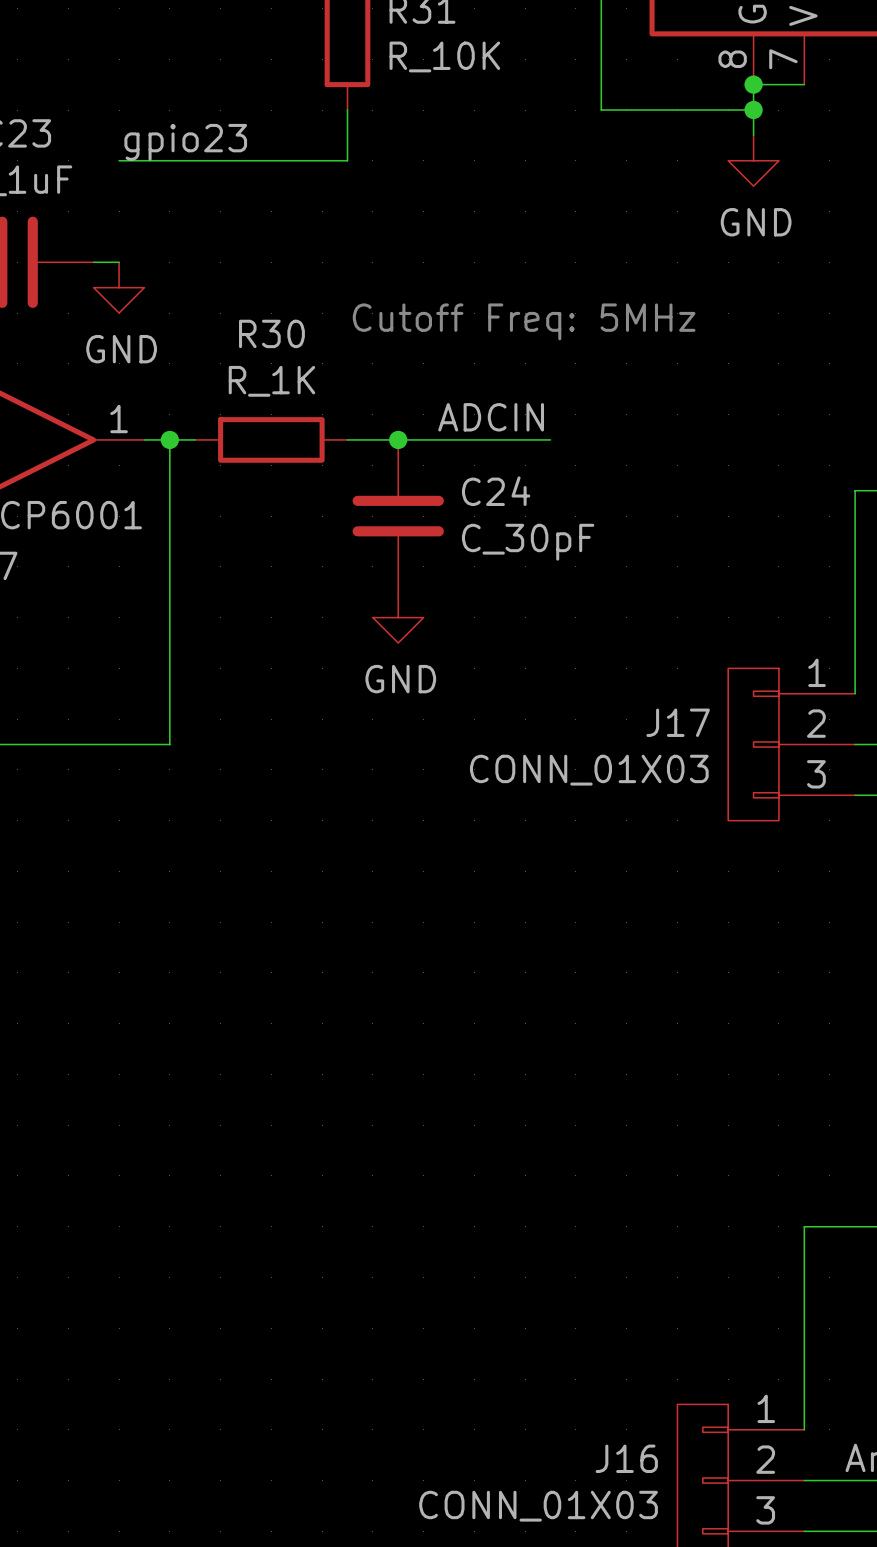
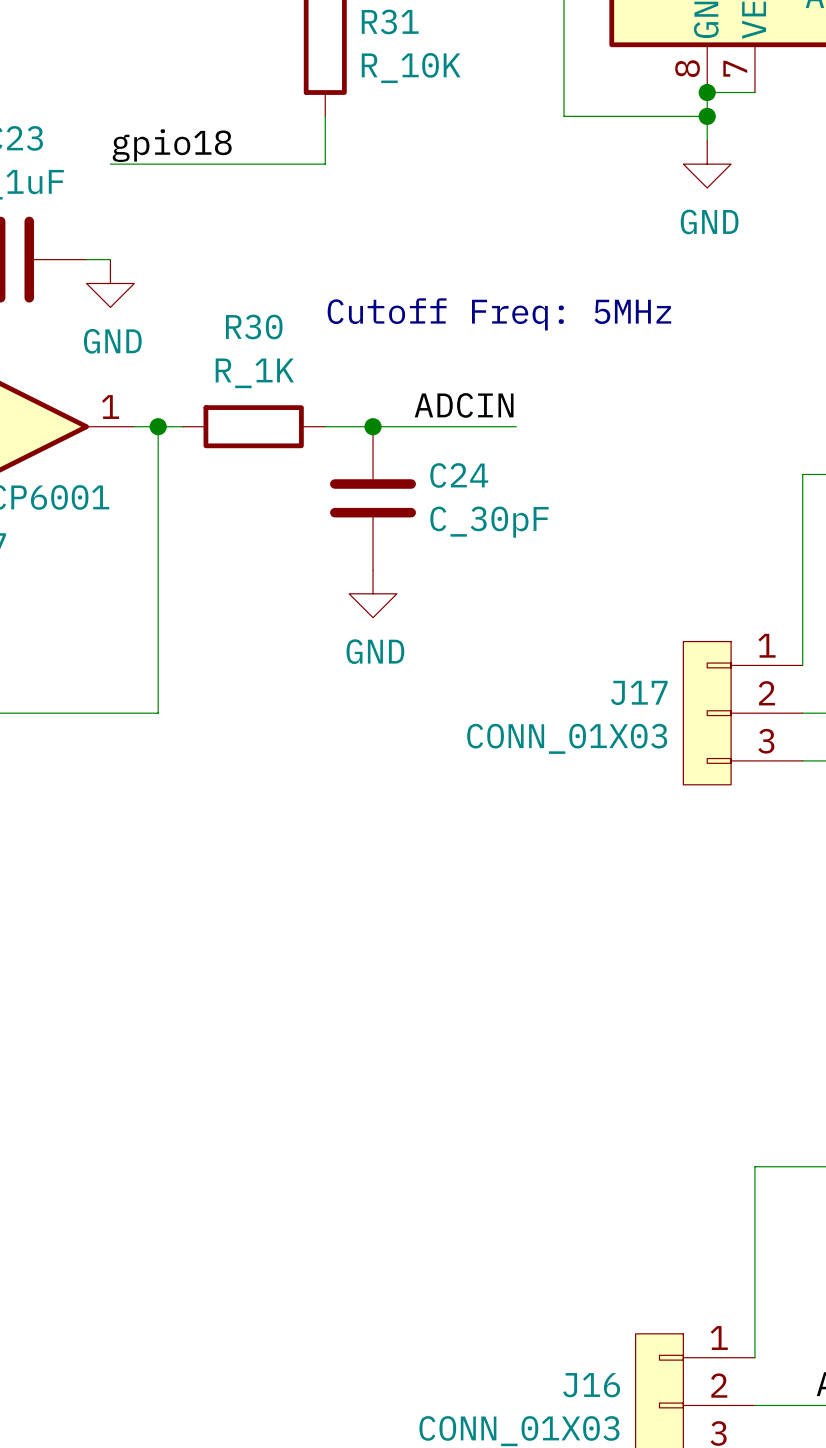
label: gpio23 (185, 142) -> gpio18 (172, 145)

